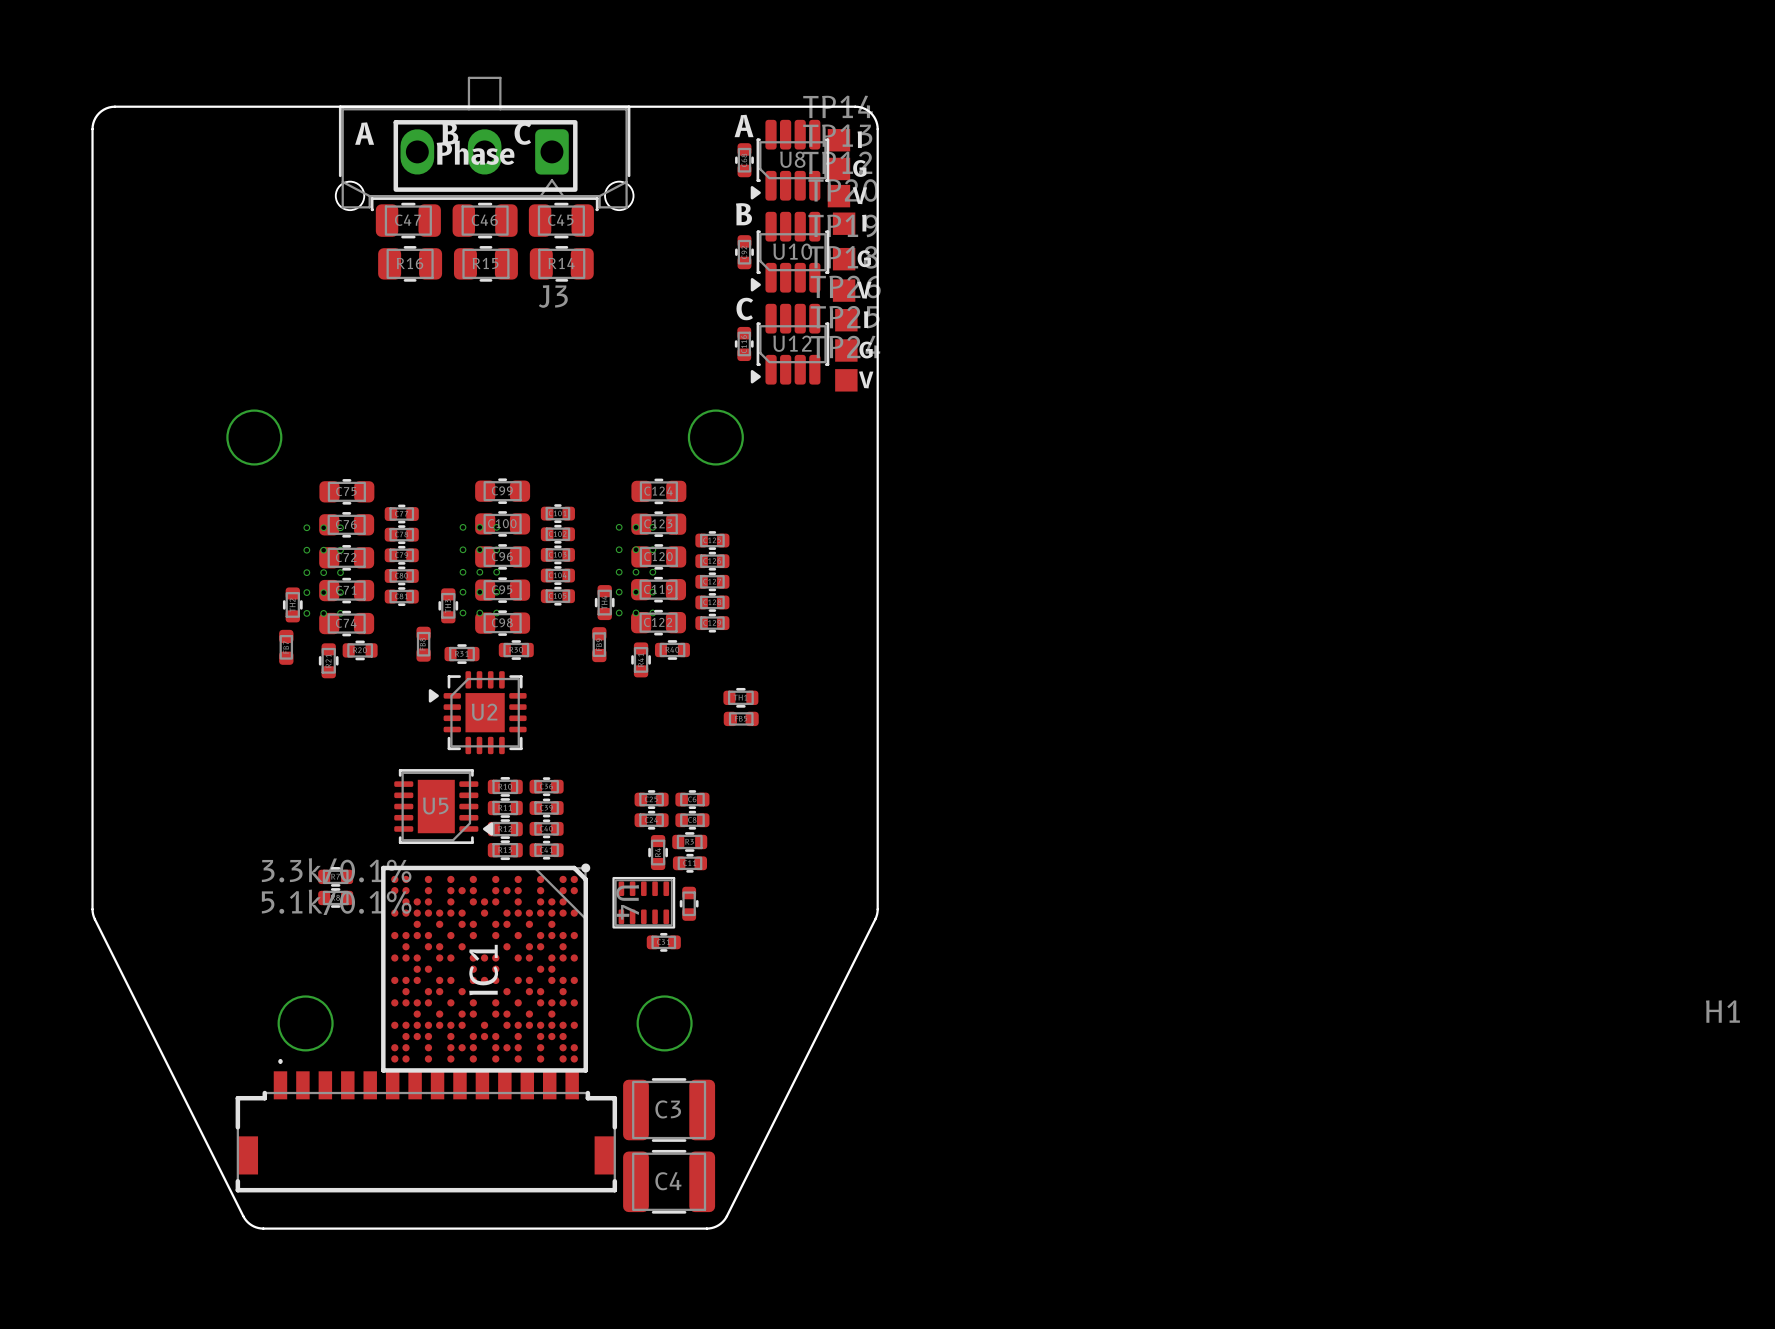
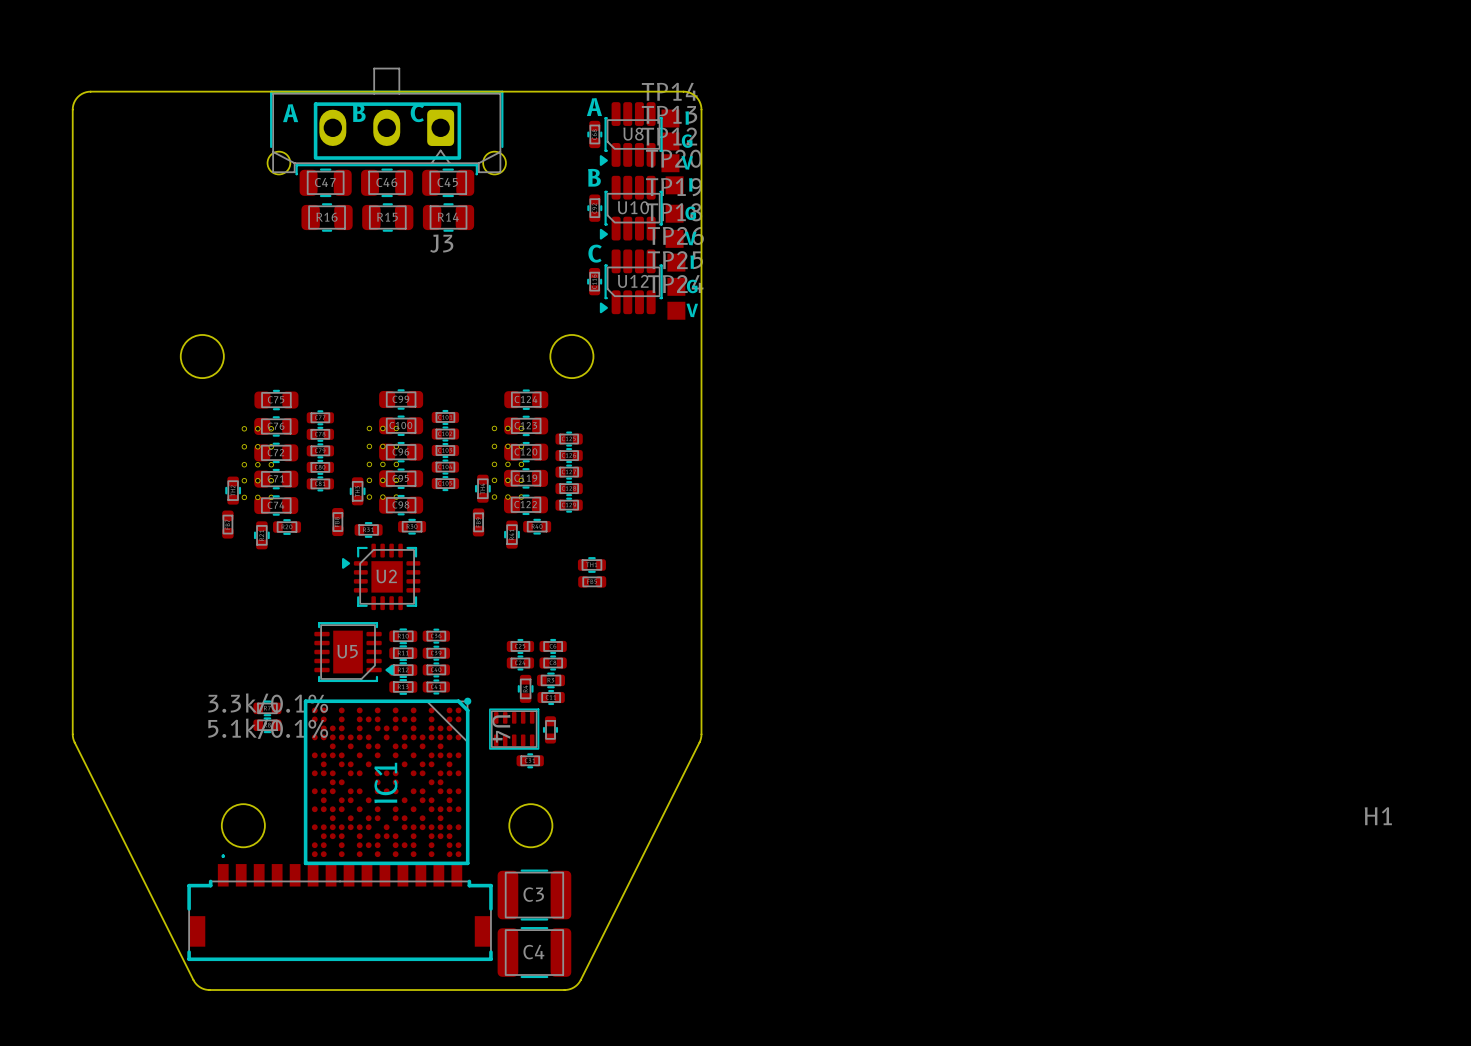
H1 text: Phase (475, 152) -> none

